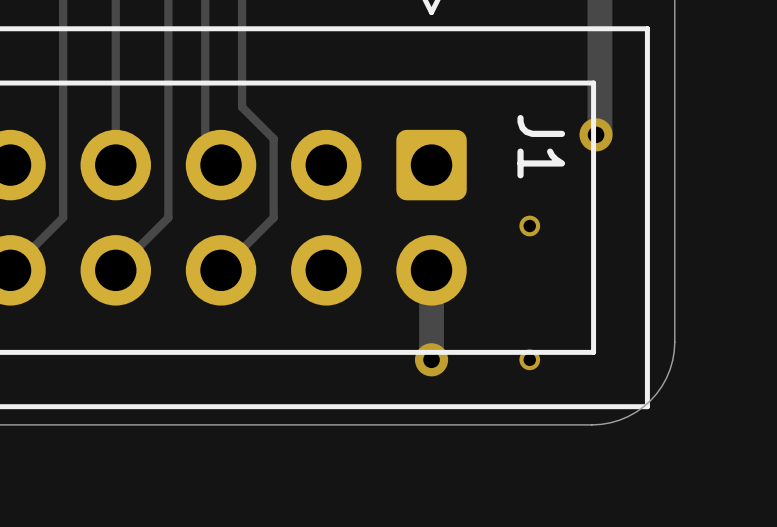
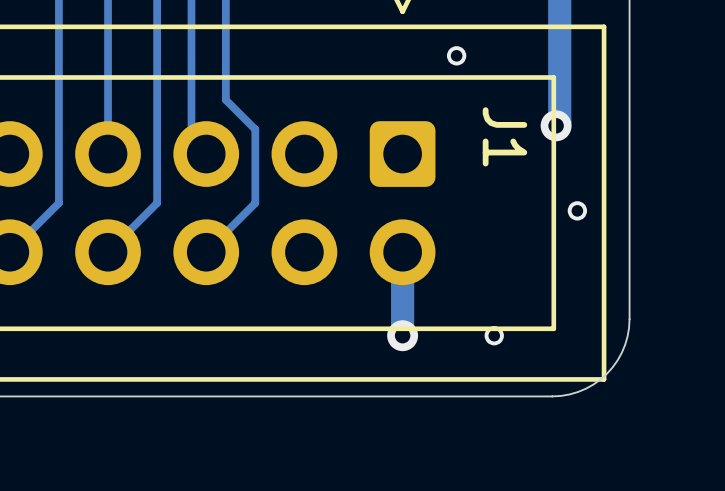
via: none -> (456, 55)
via: (529, 226) -> none
via: none -> (577, 210)

